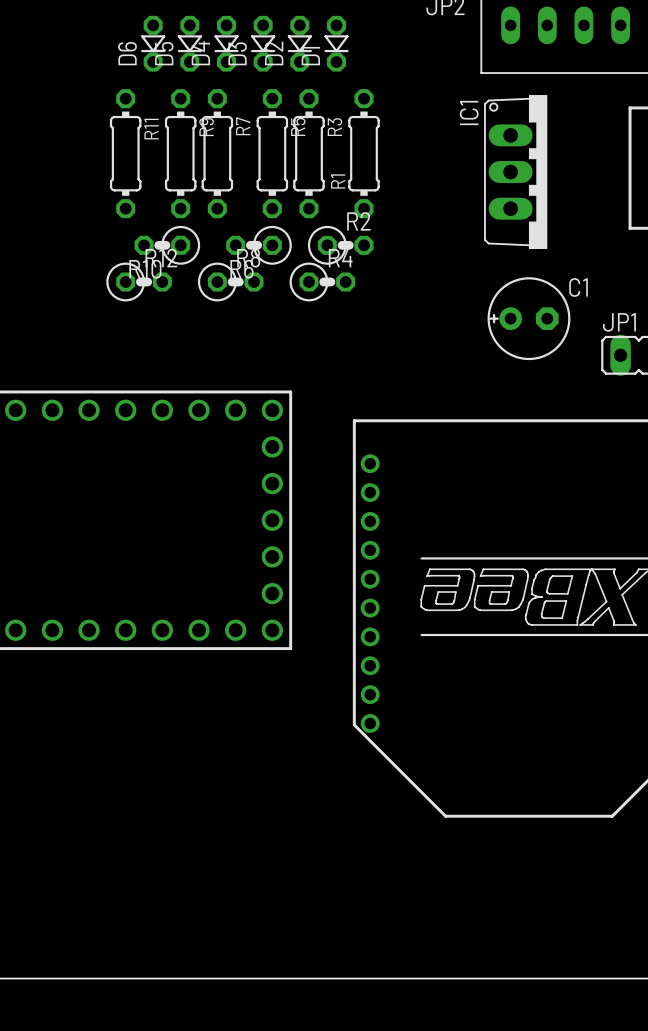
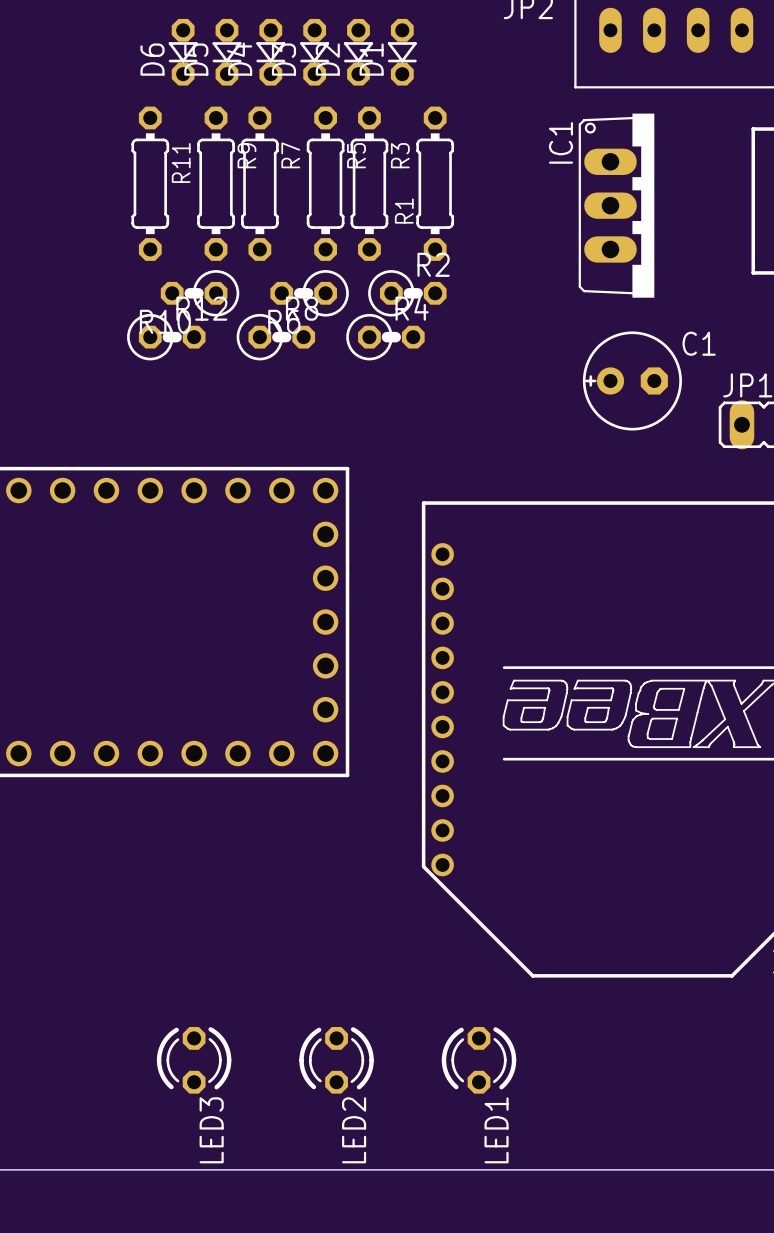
LED3: none -> (194, 1060)
LED2: none -> (336, 1060)
LED1: none -> (479, 1060)

